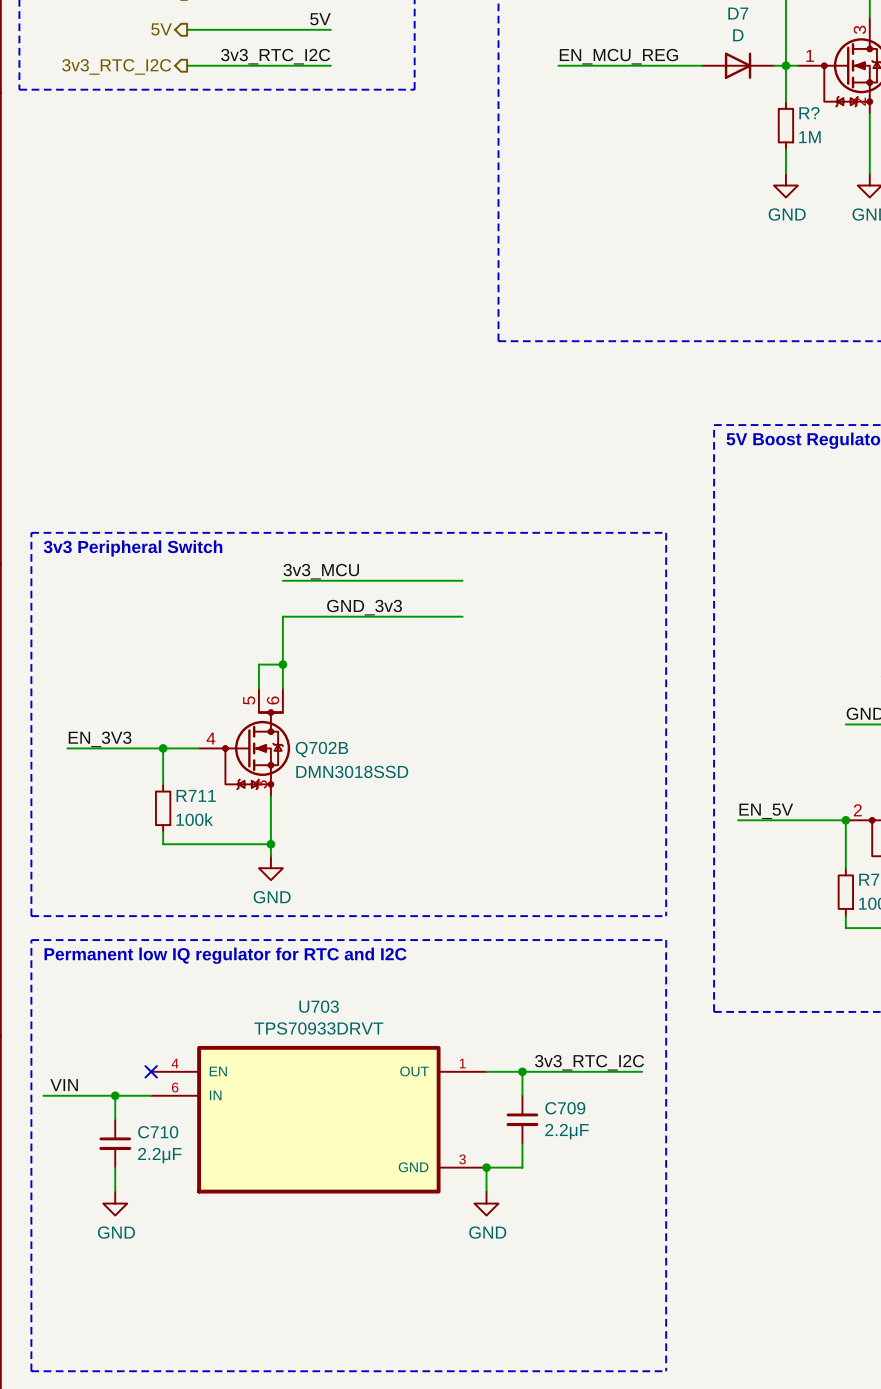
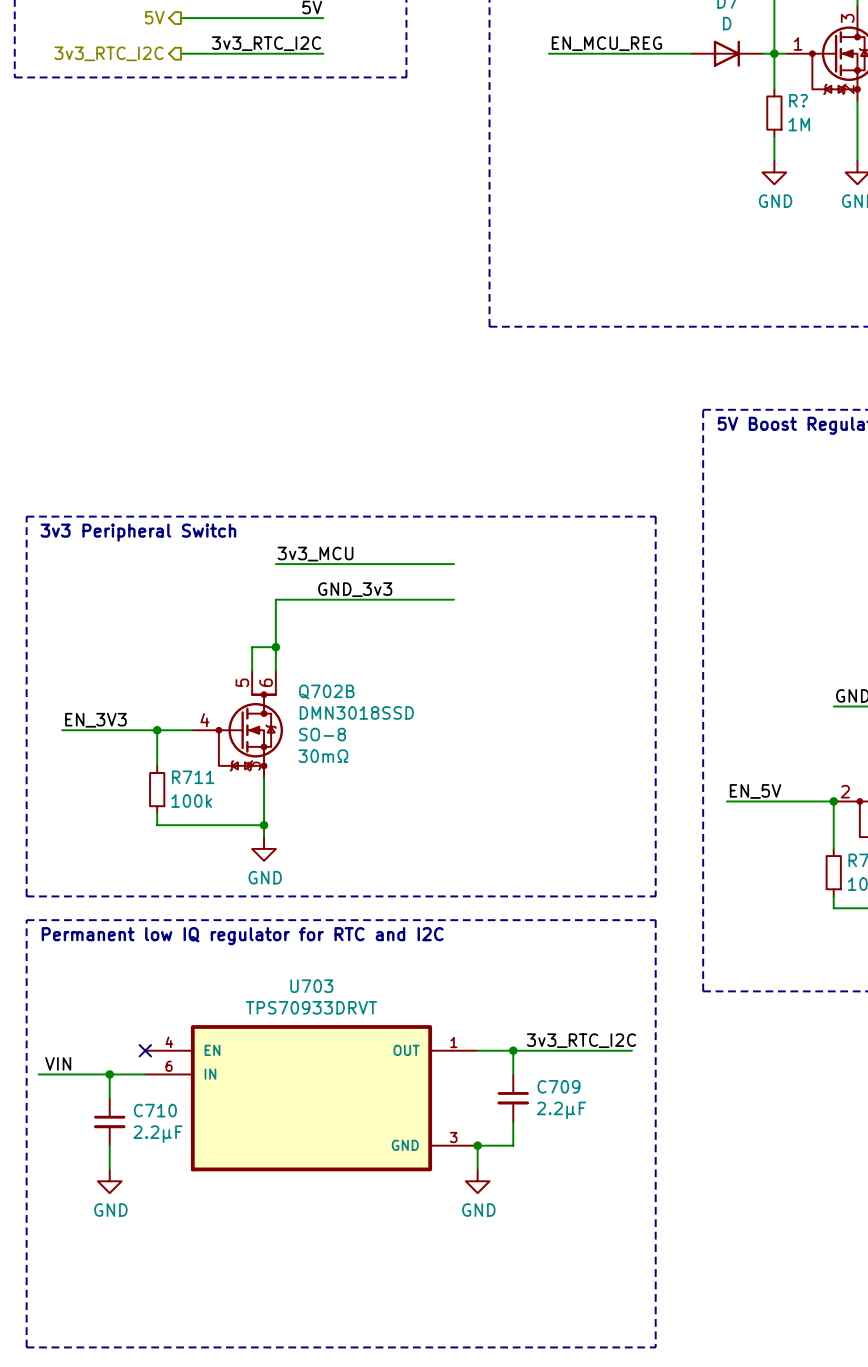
Q702B name position: Q702B (321, 749) -> Q702B (326, 691)
Q702B text: none -> SO-8 (322, 734)
Q702B value position: DMN3018SSD (352, 771) -> DMN3018SSD (356, 712)
Q702B text: none -> 30mΩ (323, 756)

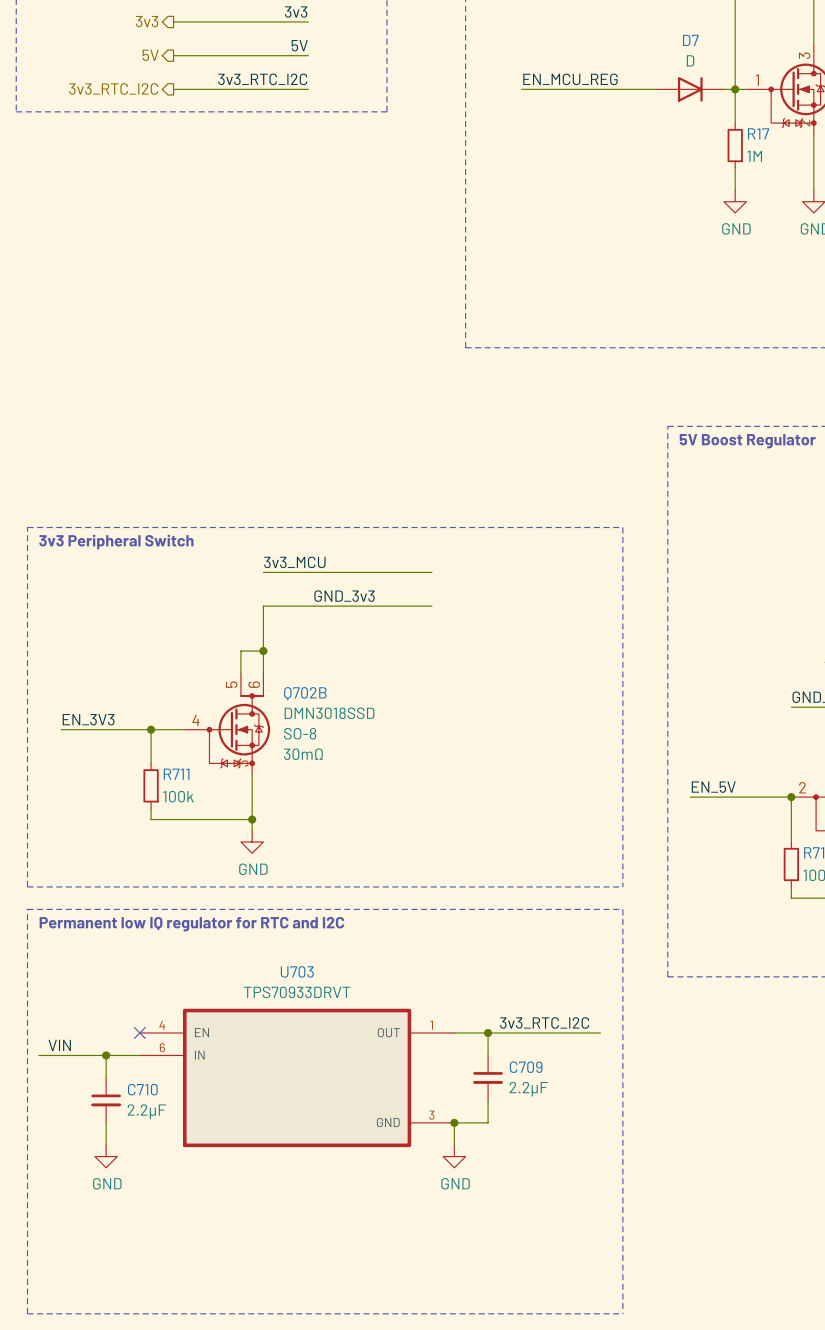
R? name: R? (798, 100) -> R17 (758, 133)

